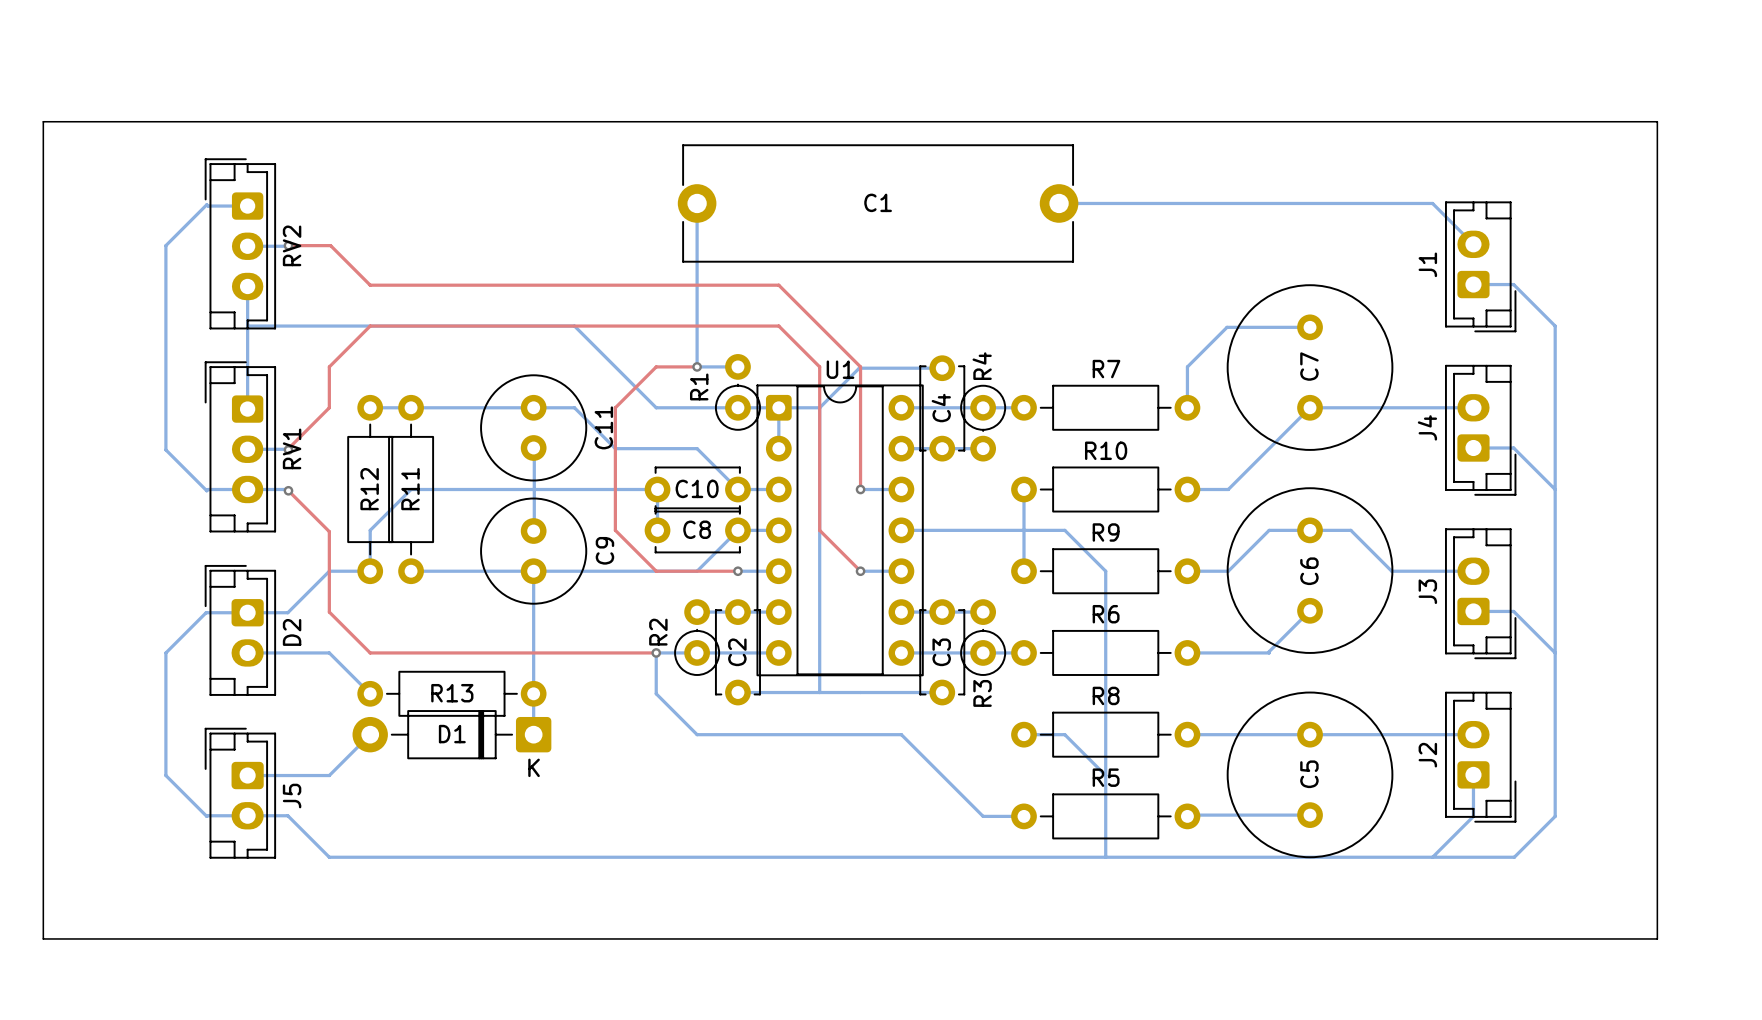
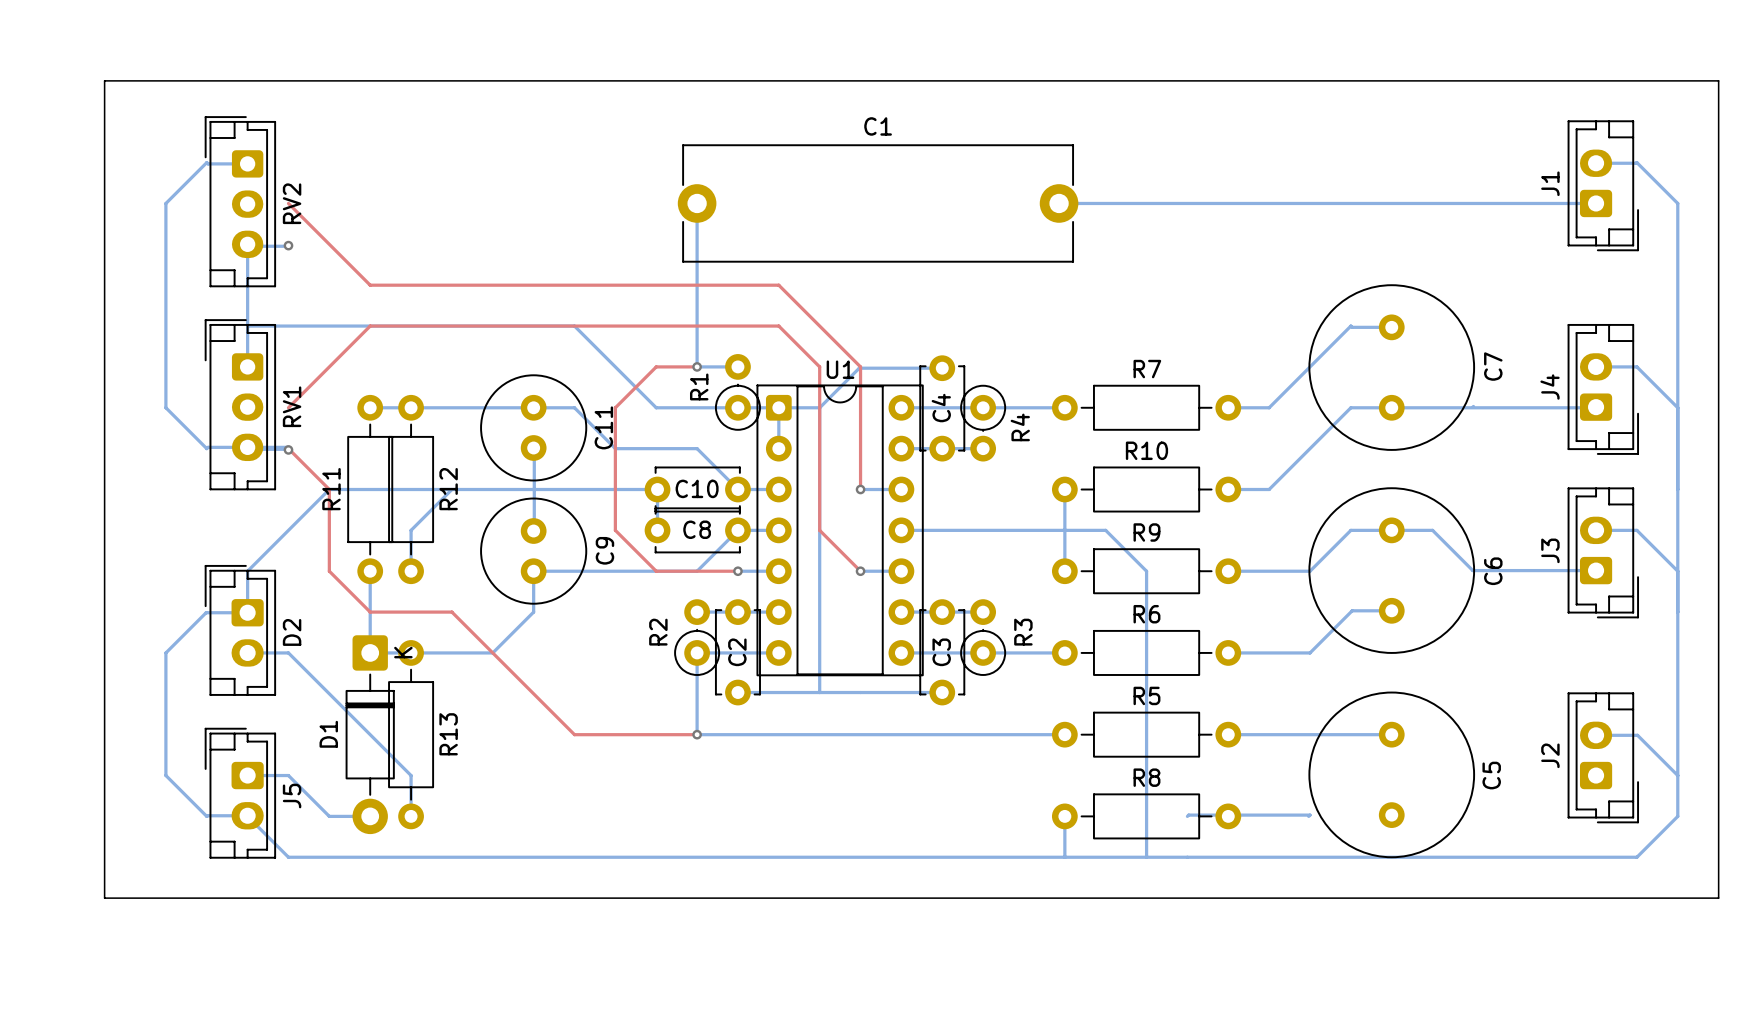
board edge: (43, 121) (1657, 121) (1657, 938) (43, 938) (43, 121) -> (104, 80) (1718, 80) (1718, 898) (104, 898) (104, 80)
C1 name position: C1 (878, 202) -> C1 (878, 126)
bottom track: (1432, 203) (1473, 244) -> (1432, 203) (1596, 203)
bottom track: (247, 206) (206, 204) (165, 245) -> (247, 163) (206, 162) (165, 203) (165, 245)
RV2 position: (240, 243) -> (240, 201)
top track: (288, 245) (330, 245) -> (288, 203) (330, 245)
J1 position: (1480, 266) -> (1603, 185)
bottom track: (1473, 284) (1513, 284) (1555, 326) (1555, 816) (1514, 857) -> (1596, 163) (1636, 162) (1677, 203) (1677, 816) (1636, 857) (1514, 857)
bottom track: (1310, 327) (1227, 327) (1187, 366) (1187, 407) -> none
bottom track: none -> (1391, 327) (1350, 326) (1269, 407) (1228, 407)
bottom track: (247, 366) (247, 409) -> (247, 244) (247, 286)
top track: (329, 366) (329, 407) (288, 449) -> (329, 366) (288, 407)
R4 name position: R4 (982, 366) -> R4 (1020, 427)
C7 name position: C7 (1309, 366) -> C7 (1493, 366)
bottom track: none -> (1596, 366) (1636, 366) (1677, 407)
C7 position: (1310, 367) -> (1391, 367)
bottom track: (165, 407) (165, 449) (206, 490) (288, 490) -> (165, 407) (206, 448) (288, 448)
R7 position: (1105, 407) -> (1146, 407)
bottom track: (1350, 407) (1310, 407) (1228, 489) (1187, 489) -> (1350, 407) (1269, 489) (1228, 489)
bottom track: none -> (1596, 407) (1473, 407)
J4 position: (1480, 430) -> (1603, 389)
RV1 position: (240, 446) -> (240, 404)
bottom track: (1473, 448) (1513, 448) (1555, 489) -> none
R12 name: R12 (369, 489) -> R11 (331, 489)
R11 name: R11 (410, 489) -> R12 (448, 489)
bottom track: (411, 489) (370, 530) (370, 571) (329, 571) (287, 612) (247, 612) -> (411, 489) (329, 489) (247, 571) (247, 612)
bottom track: (1023, 489) (1023, 571) -> (1064, 489) (1064, 571)
R10 position: (1105, 489) -> (1146, 489)
top track: (288, 490) (329, 531) -> (288, 448) (329, 489) (329, 531)
via: (288, 490) -> none
bottom track: (1064, 530) (1105, 571) (1105, 857) -> (1064, 530) (1105, 530) (1146, 571) (1146, 857)
bottom track: none -> (1596, 530) (1636, 530) (1677, 571)
C6 position: (1310, 570) -> (1391, 570)
bottom track: none -> (1596, 570) (1472, 570) (1432, 530) (1350, 530) (1310, 571) (1228, 571)
top track: (329, 571) (329, 612) (370, 652) (656, 652) -> (329, 571) (370, 612) (451, 612) (574, 734) (697, 734)
bottom track: (411, 571) (533, 571) -> (411, 571) (411, 530) (451, 489)
R9 position: (1105, 571) -> (1146, 571)
bottom track: (1187, 571) (1228, 571) (1269, 530) (1350, 530) (1391, 571) (1473, 571) -> none
C6 name position: C6 (1309, 571) -> C6 (1493, 571)
J3 position: (1480, 593) -> (1603, 552)
bottom track: (1310, 610) (1269, 652) -> (1391, 610) (1352, 610) (1310, 652) (1269, 652)
bottom track: (1473, 611) (1513, 611) (1555, 652) -> none
bottom track: (533, 612) (533, 734) -> (533, 612) (492, 652) (370, 652) (370, 571)
bottom track: (288, 652) (329, 652) (370, 693) -> (288, 652) (411, 775) (411, 816)
via position: (656, 652) -> (697, 734)
bottom track: (697, 652) (656, 652) (656, 693) (697, 734) -> (697, 652) (697, 734)
R6 position: (1105, 652) -> (1146, 652)
bottom track: (1187, 652) (1228, 652) -> (1023, 652) (1064, 652)
R13 rotation: 0° (451, 693) -> 90° clockwise (411, 734)
R13 name position: R13 (452, 693) -> R13 (448, 734)
R3 name position: R3 (982, 693) -> R3 (1023, 632)
bottom track: (370, 734) (329, 775) (288, 775) -> (370, 816) (329, 816) (288, 775)
D1 rotation: 0° (451, 734) -> 90° counterclockwise (370, 734)
D1 name position: D1 (452, 734) -> D1 (328, 734)
bottom track: (901, 734) (983, 816) (1023, 816) -> (901, 734) (1023, 734)
bottom track: (1064, 734) (1105, 775) -> none
R8 position: (1105, 734) -> (1146, 816)
bottom track: (1187, 734) (1228, 734) -> (1023, 407) (1064, 407)
bottom track: (1391, 734) (1473, 734) -> none
bottom track: none -> (1596, 735) (1637, 735) (1677, 775)
J2 position: (1480, 757) -> (1603, 757)
C5 name position: C5 (1309, 774) -> C5 (1491, 775)
C5 position: (1310, 774) -> (1391, 774)
bottom track: (1473, 774) (1473, 816) (1432, 857) -> none
bottom track: (247, 815) (287, 815) (329, 857) -> (247, 816) (288, 857) (329, 857)
bottom track: none -> (1064, 816) (1064, 857)
R5 position: (1105, 816) -> (1146, 734)

